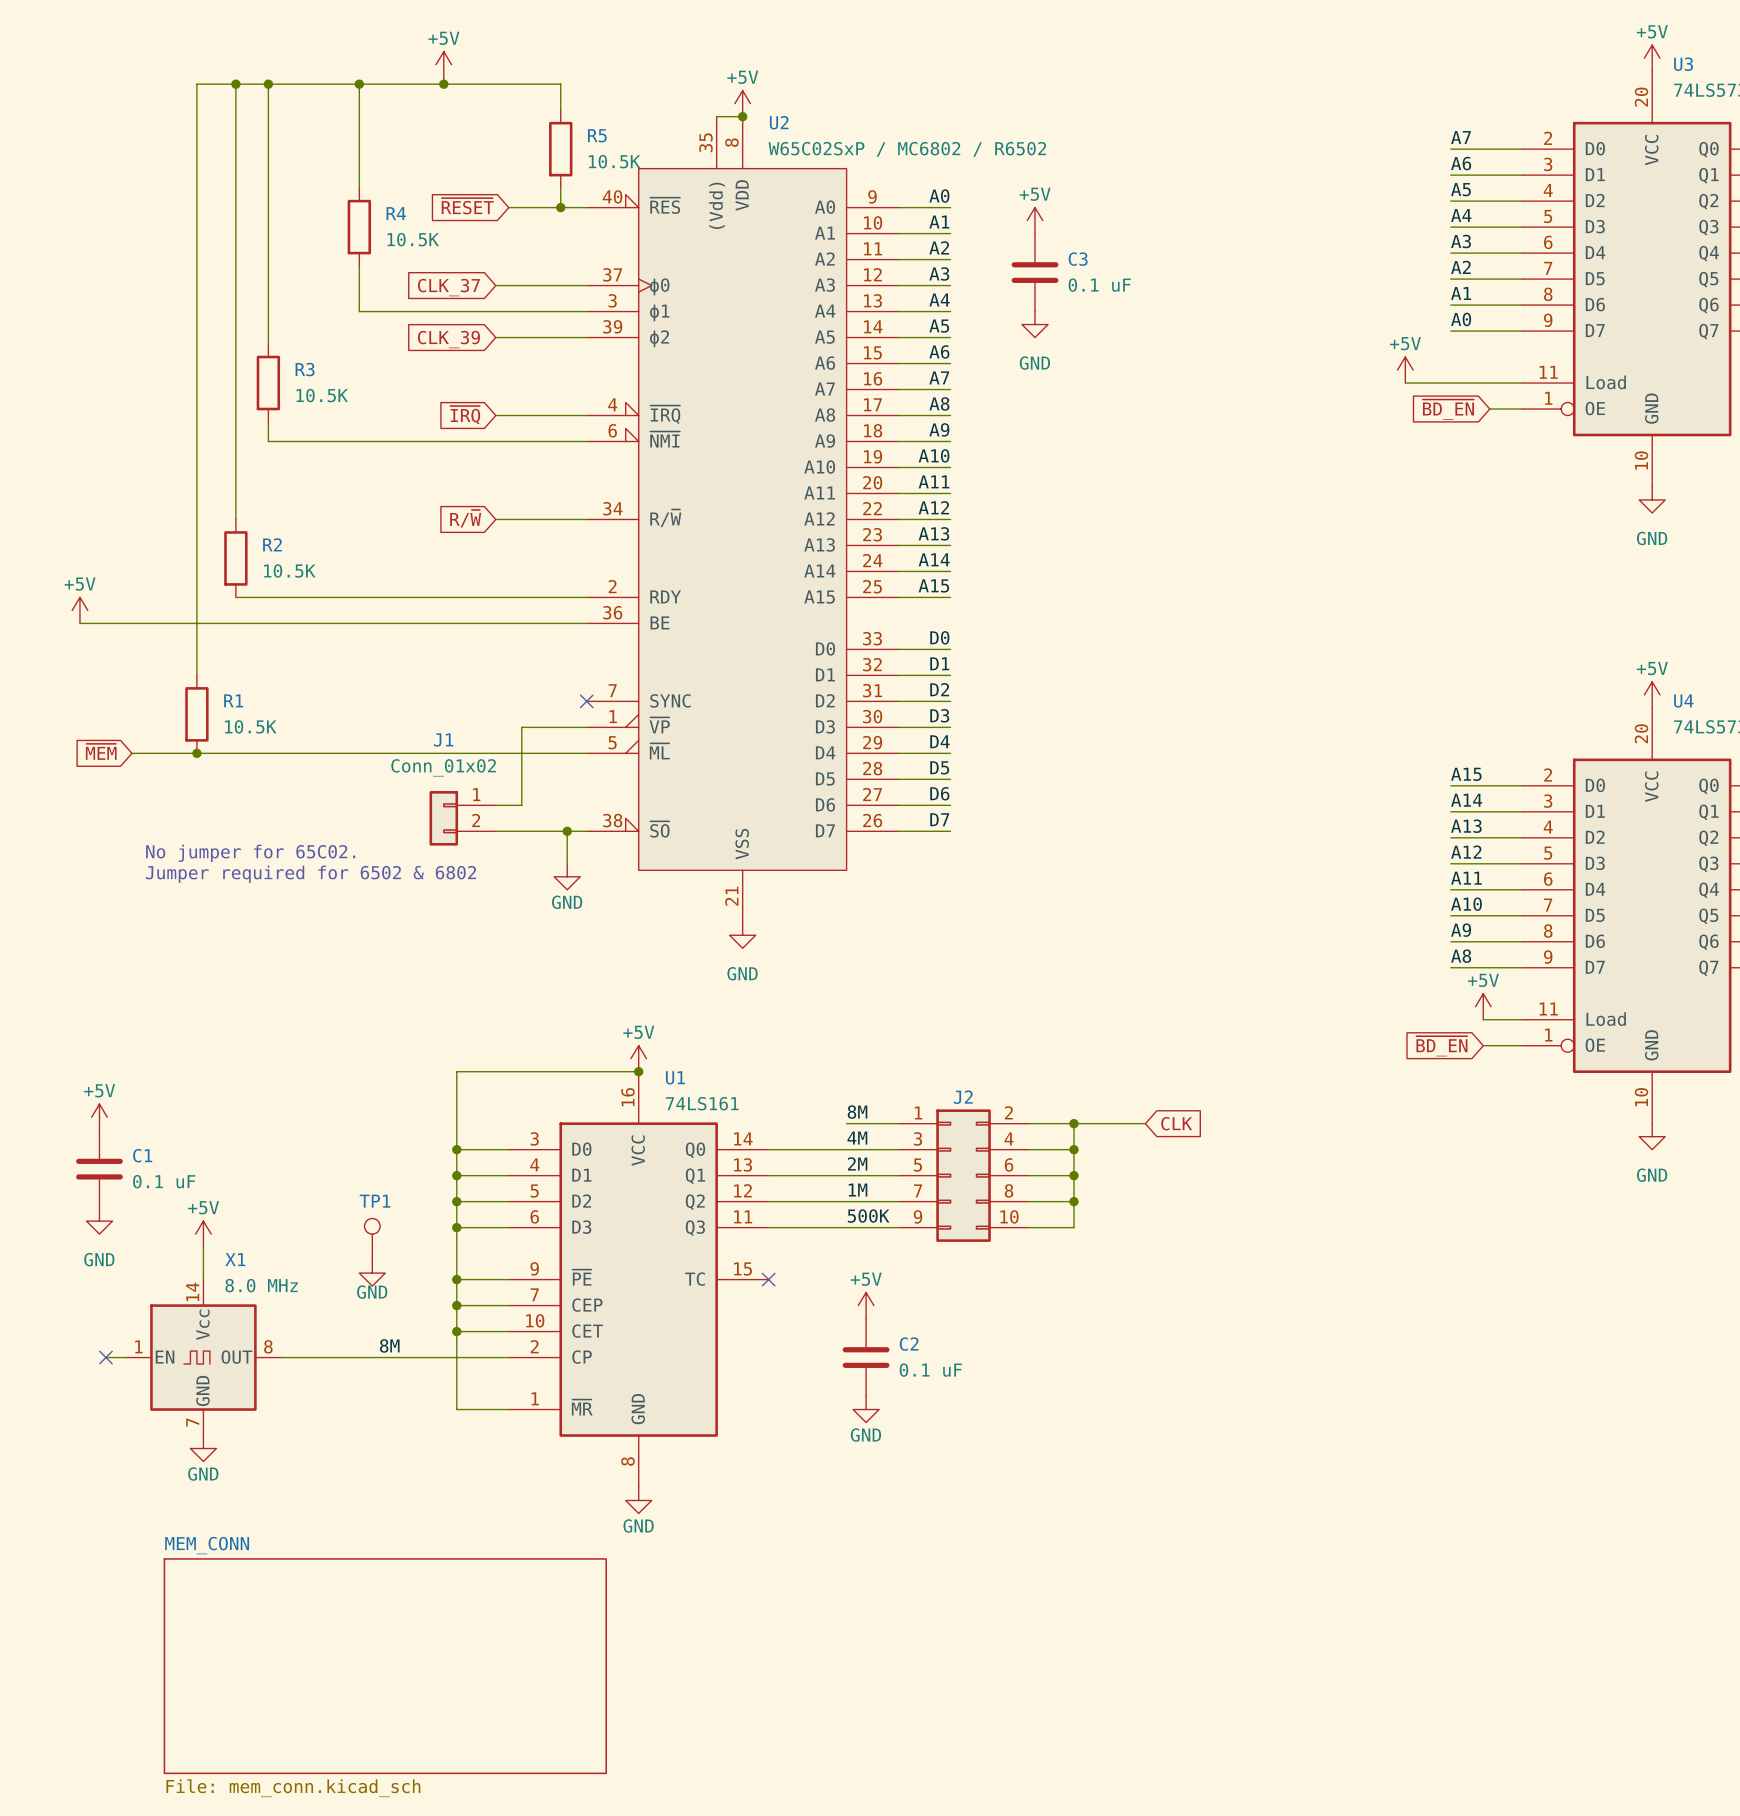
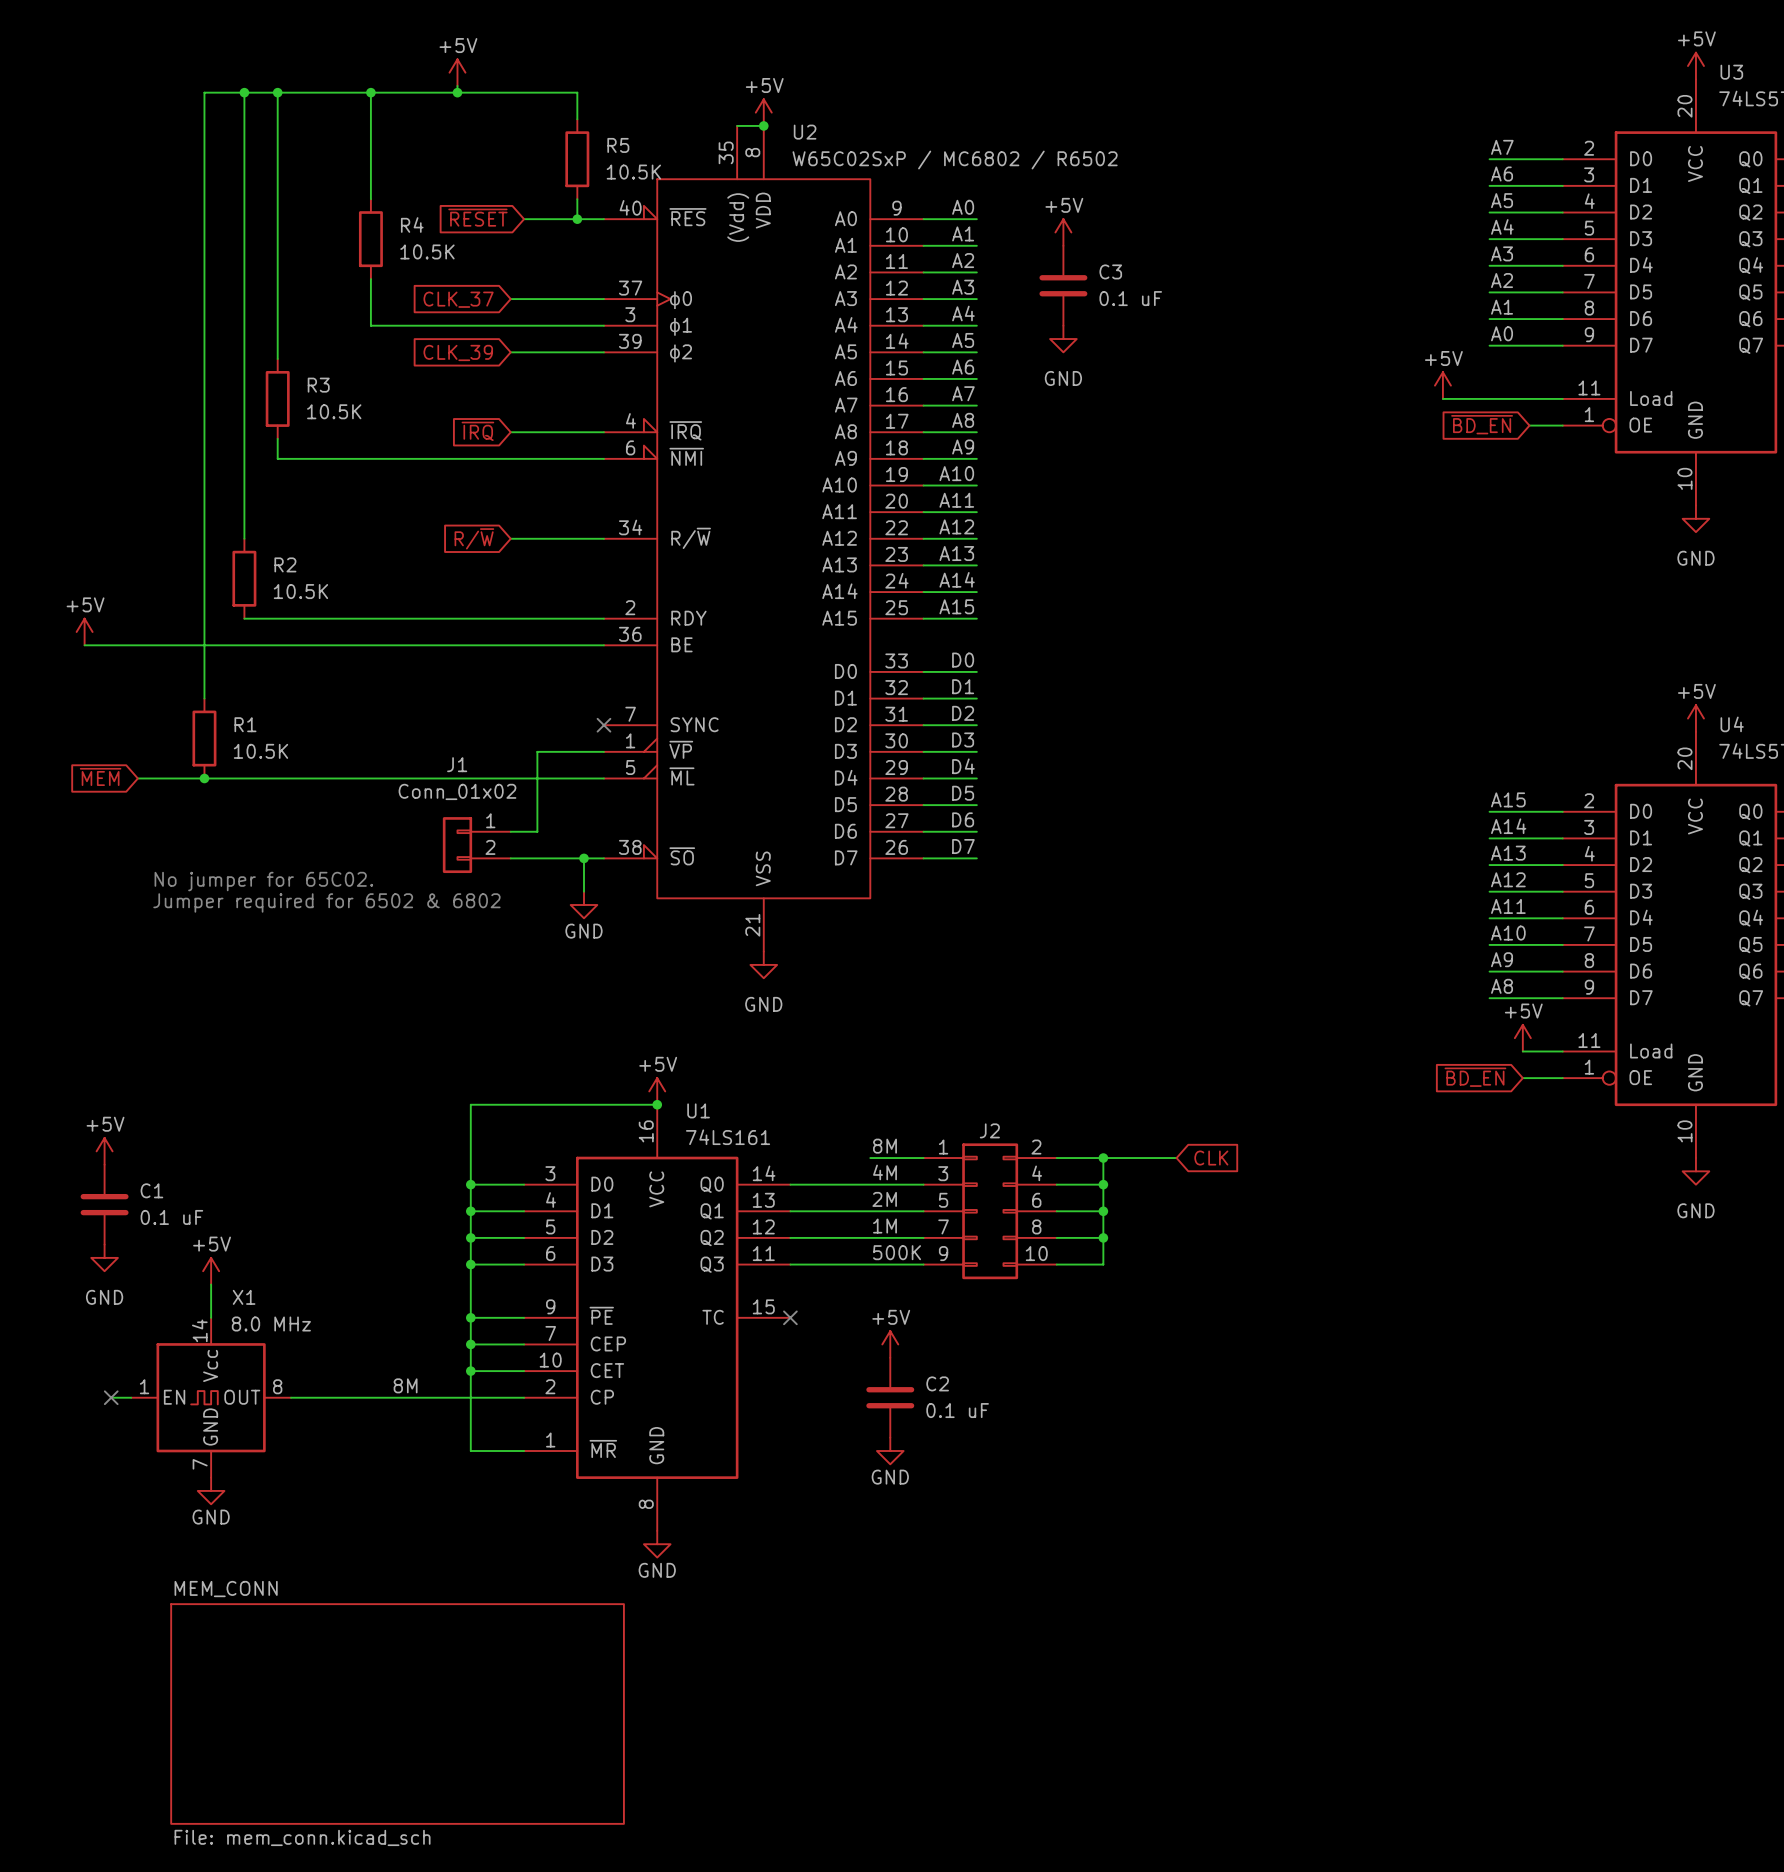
TP1: (372, 1239) -> none
power symbol: GND (372, 1273) -> none

